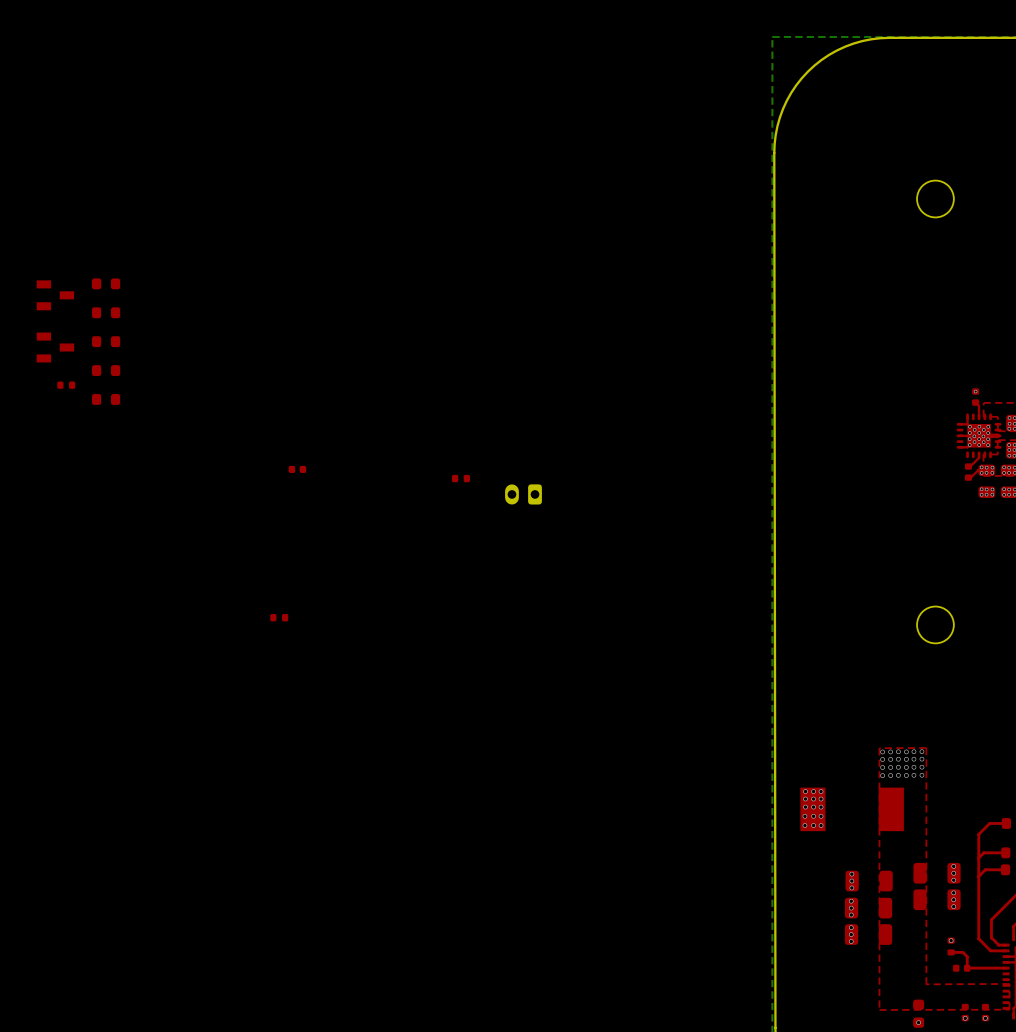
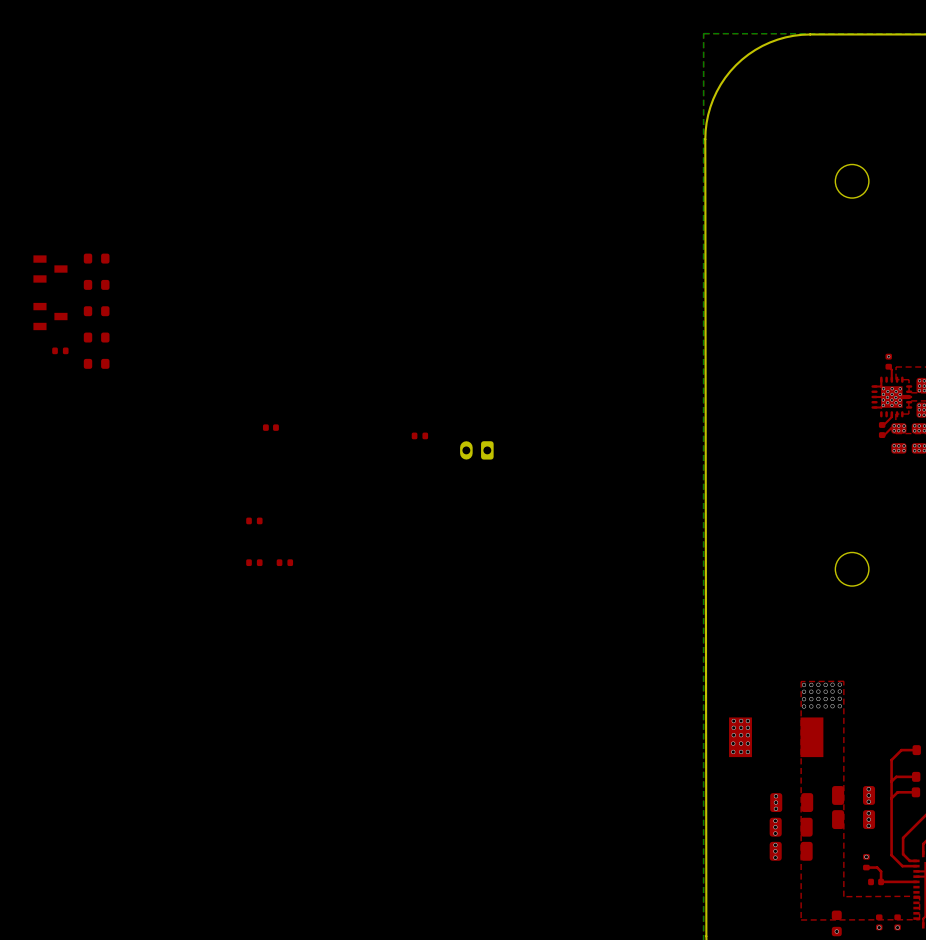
part: none -> (254, 520)
part: none -> (284, 562)

